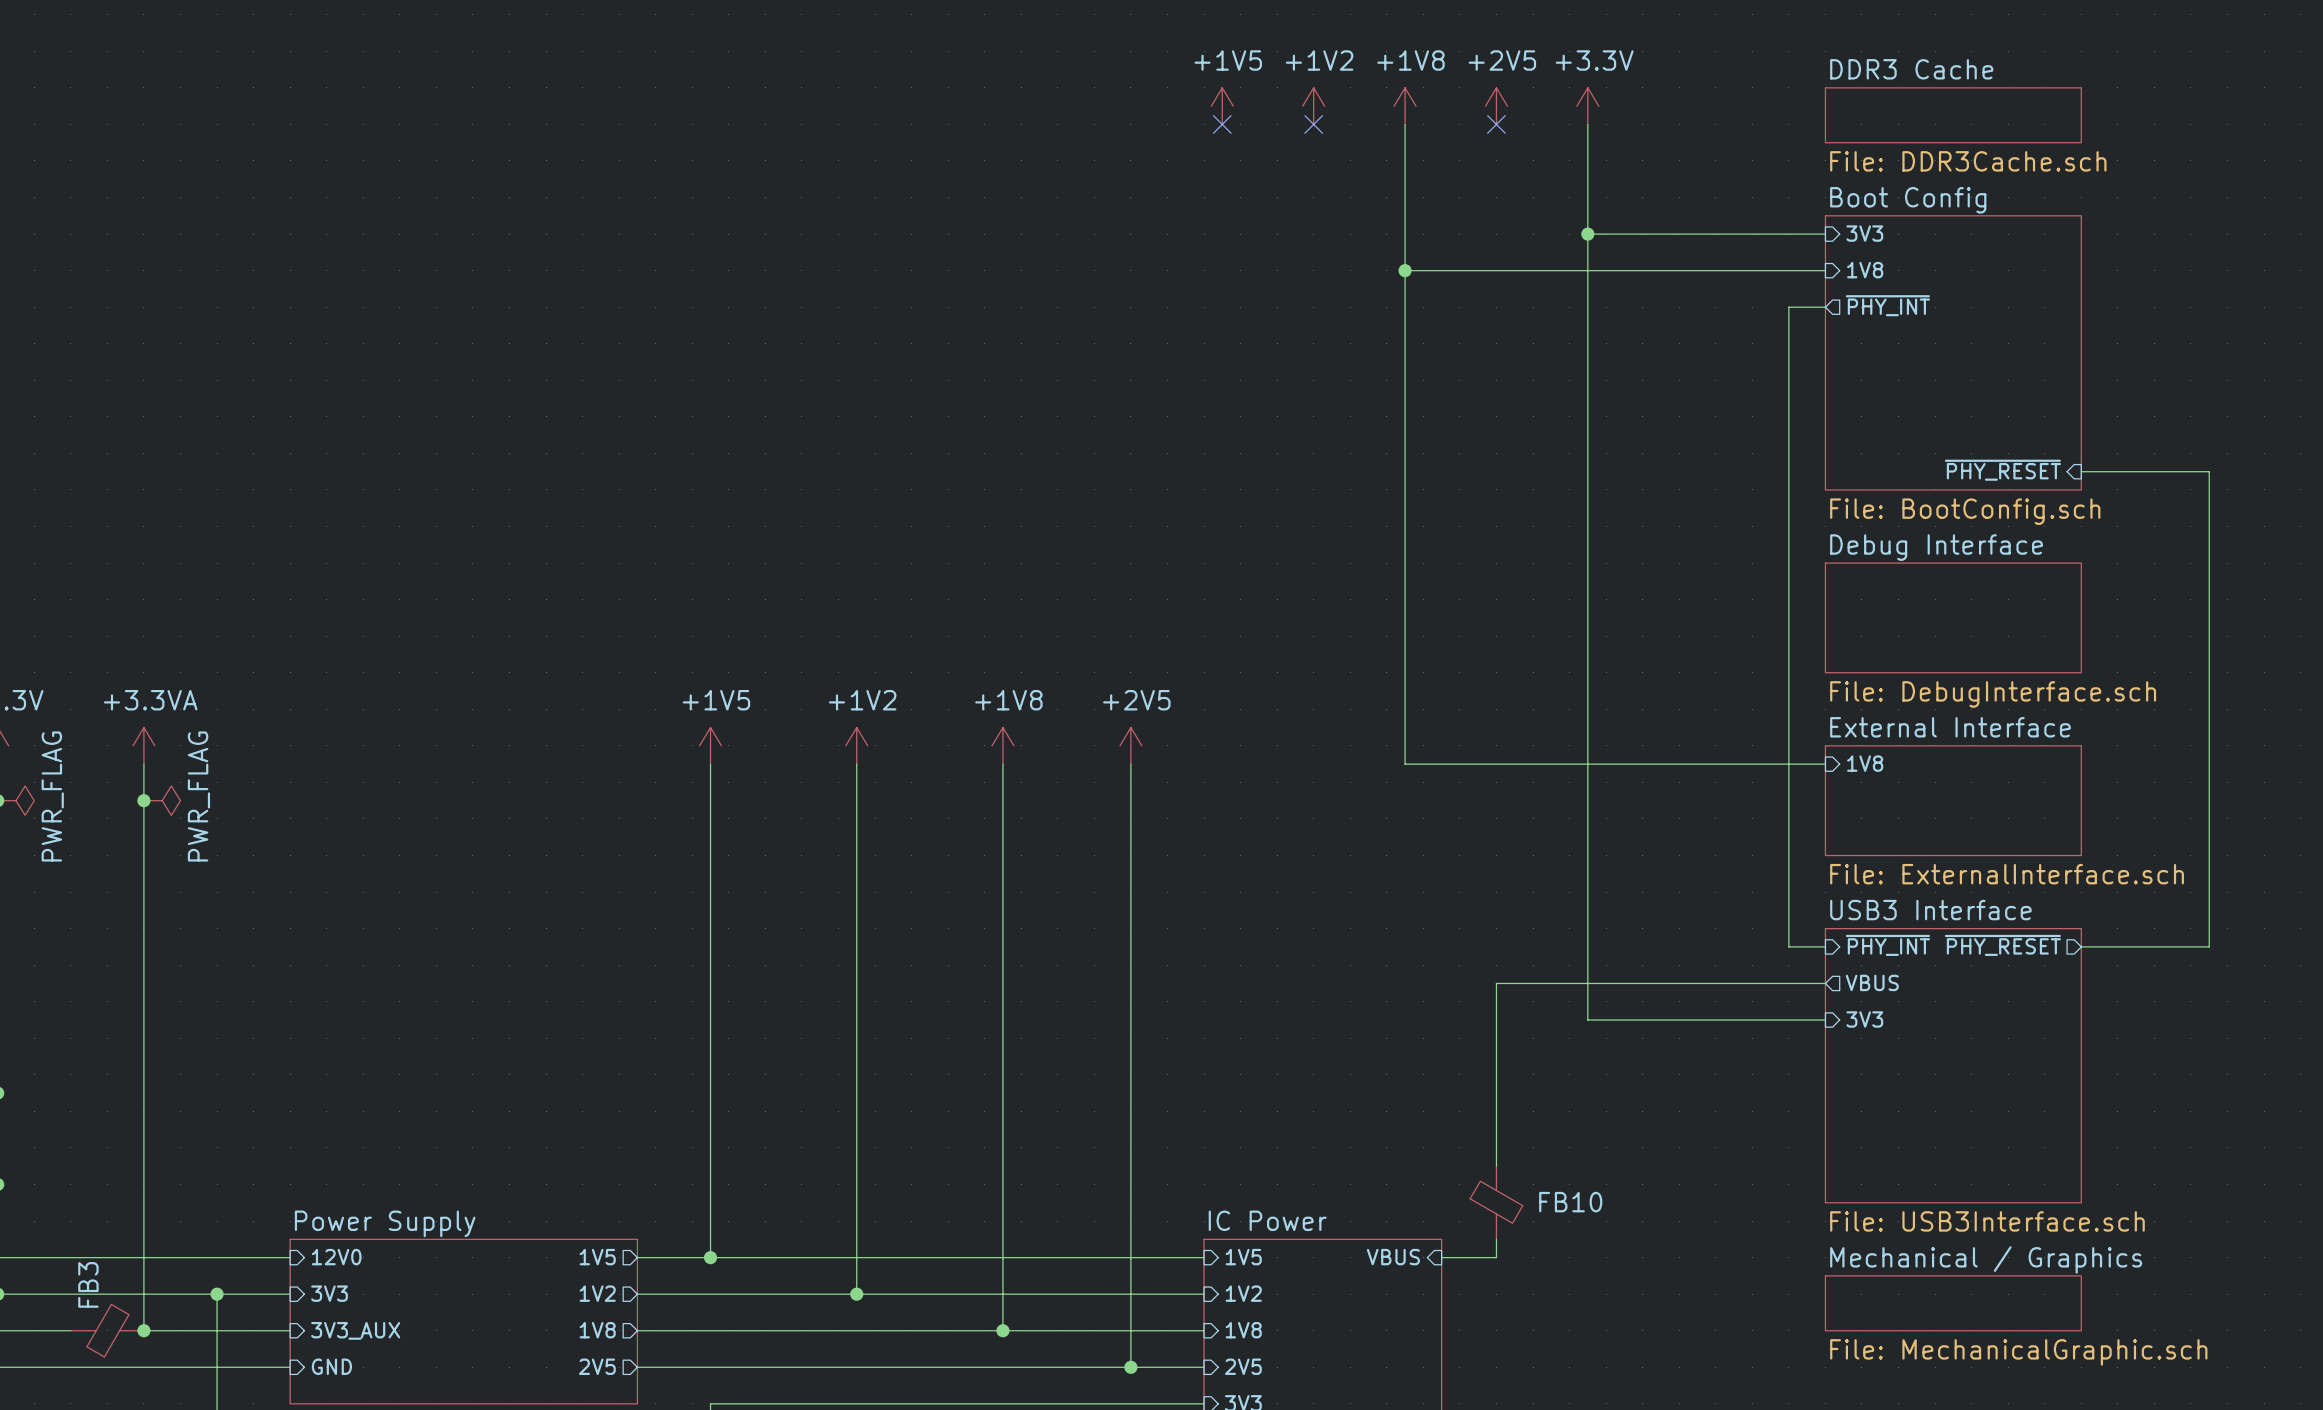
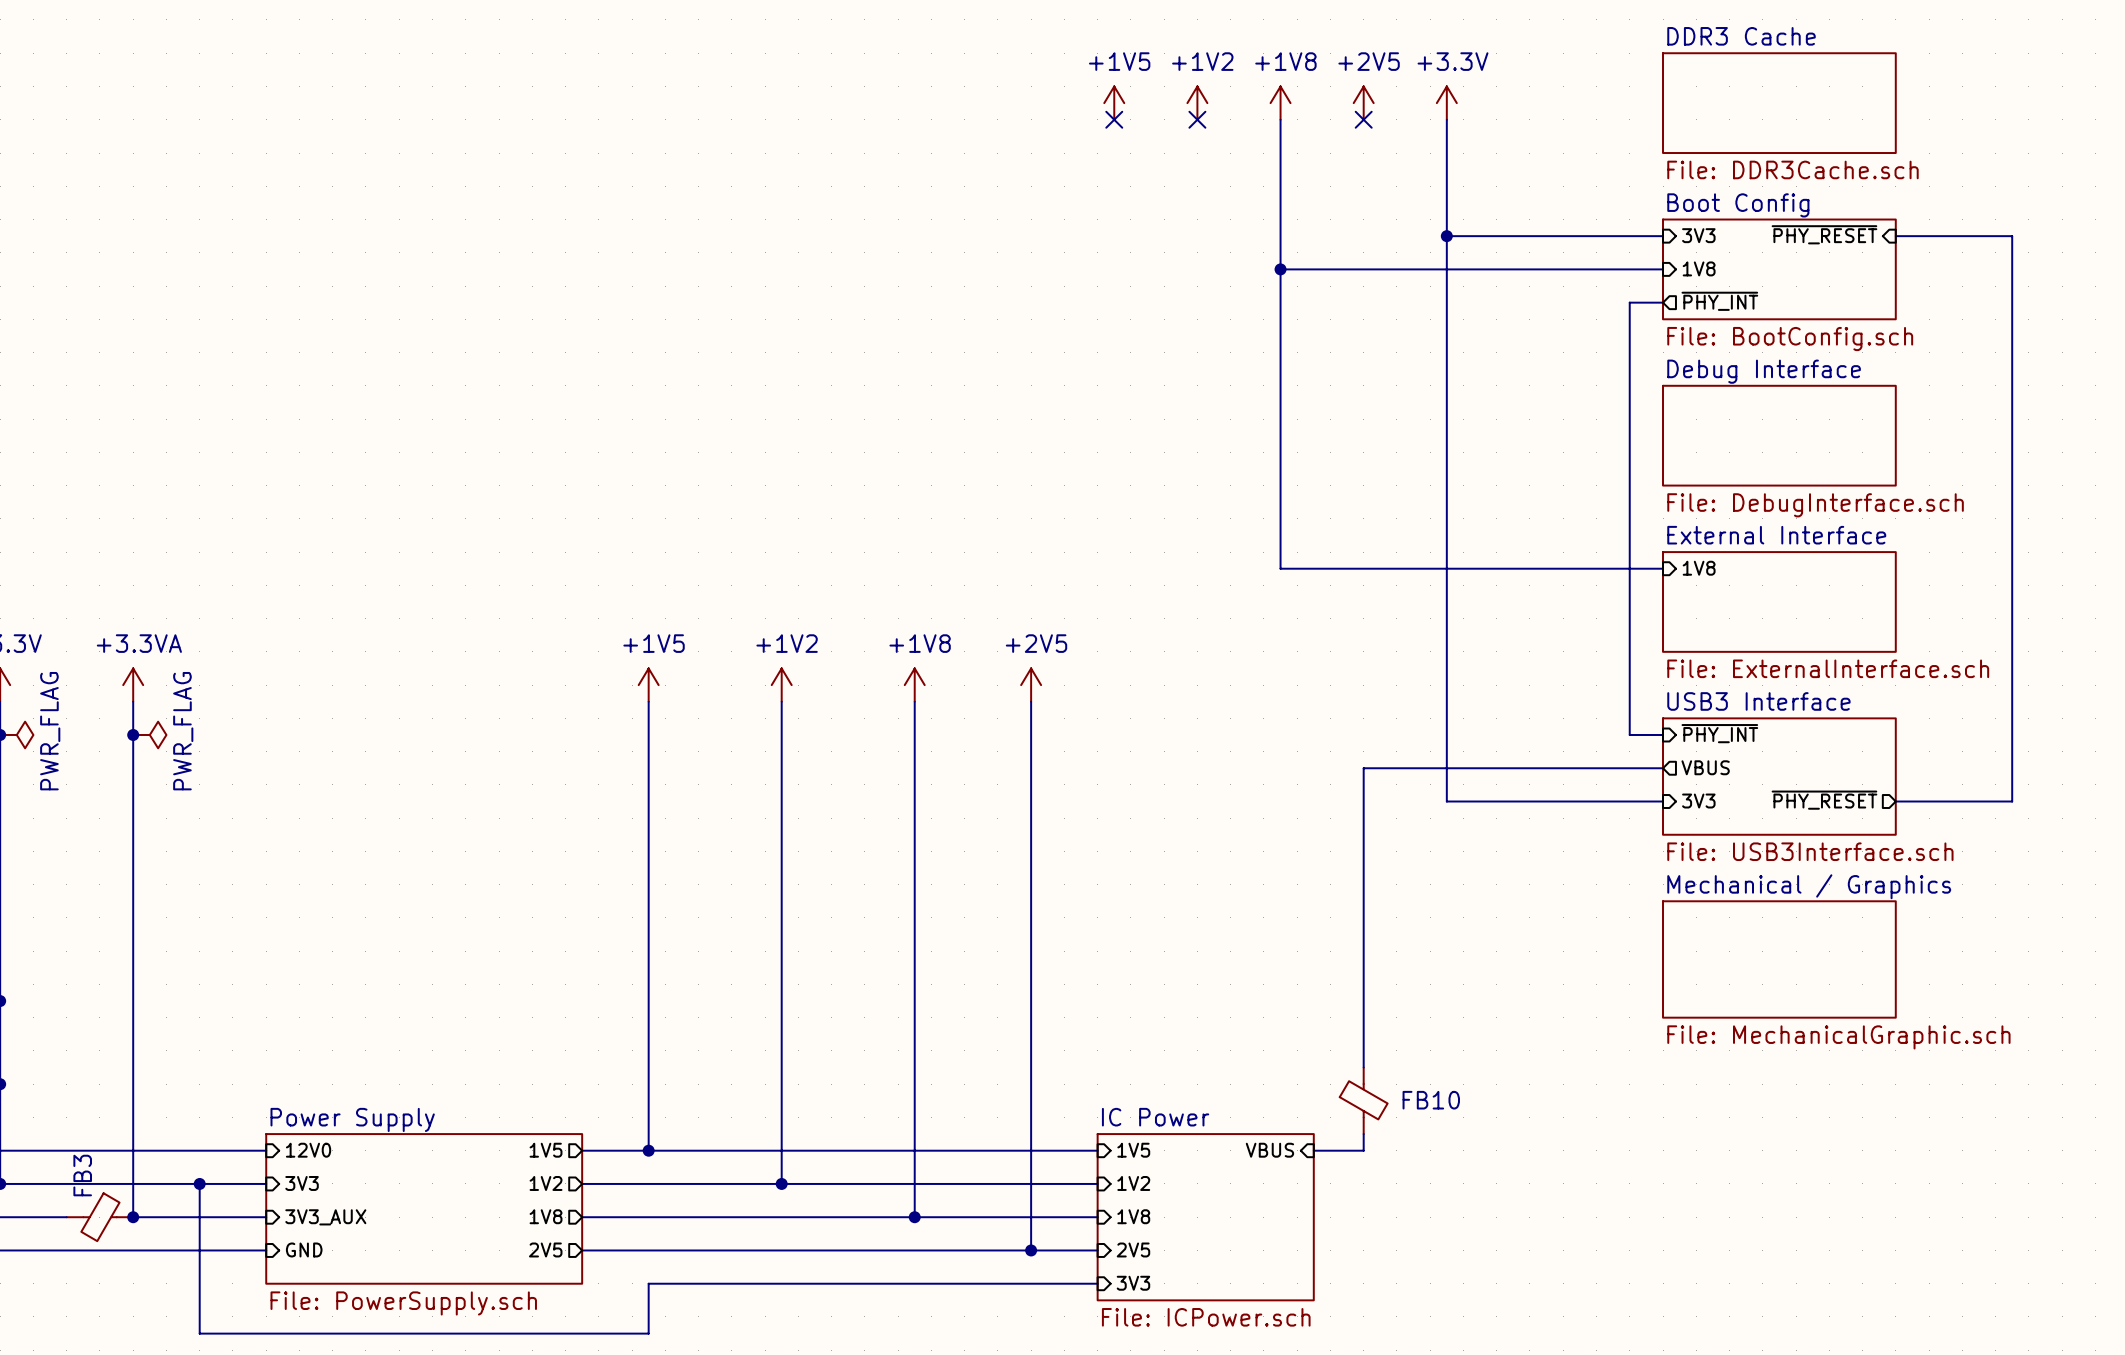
sheet DDR3 Cache shape: [1825, 87, 2082, 143] -> [1663, 53, 1896, 154]
sheet pin position: 3V3 (1864, 233) -> 3V3 (1698, 235)
wire: (1587, 234) (1825, 234) -> (1446, 236) (1663, 236)
junction position: (1587, 234) -> (1446, 236)
sheet pin: none -> ~{PHY_RESET} (1824, 234)
wire: (1405, 270) (1825, 270) -> (1280, 269) (1663, 269)
junction position: (1405, 270) -> (1280, 269)
sheet pin position: 1V8 (1865, 270) -> 1V8 (1699, 268)
sheet Boot Config: none -> File: BootConfig.sch (1779, 269)
sheet pin position: ~{PHY_INT} (1887, 305) -> ~{PHY_INT} (1719, 301)
wire: (1825, 307) (1788, 307) (1788, 325) -> (1663, 302) (1629, 302)
sheet Boot Config: File: BootConfig.sch (1953, 352) -> none
sheet pin: ~{PHY_RESET} (2002, 470) -> none
wire: (2081, 471) (2209, 471) -> (1895, 236) (2012, 236) (2012, 435)
wire: (1405, 617) (1405, 764) (1825, 764) -> (1280, 568) (1663, 568)
sheet Debug Interface position: (1953, 617) -> (1779, 435)
sheet pin position: 1V8 (1865, 763) -> 1V8 (1699, 568)
wire: (1788, 800) (1788, 946) (1825, 946) -> (1629, 734) (1663, 734)
sheet External Interface position: (1953, 800) -> (1779, 601)
wire: (1587, 873) (1587, 1020) (1825, 1020) -> (1446, 801) (1663, 801)
wire: (2209, 873) (2209, 946) (2081, 946) -> (2012, 801) (1895, 801)
sheet USB3 Interface name position: USB3 Interface (1930, 910) -> USB3 Interface (1758, 701)
sheet USB3 Interface shape: [1825, 928, 2082, 1203] -> [1663, 718, 1896, 835]
sheet pin position: ~{PHY_INT} (1887, 945) -> ~{PHY_INT} (1719, 733)
sheet pin position: ~{PHY_RESET} (2002, 945) -> ~{PHY_RESET} (1824, 800)
sheet pin position: VBUS (1872, 982) -> VBUS (1705, 767)
wire: (1496, 983) (1825, 983) -> (1363, 901) (1363, 768) (1663, 768)
sheet pin position: 3V3 (1864, 1019) -> 3V3 (1698, 801)
sheet Mechanical / Graphics: none -> File: MechanicalGraphic.sch (1779, 959)
sheet USB3 Interface value position: File: USB3Interface.sch (1987, 1221) -> File: USB3Interface.sch (1810, 851)
sheet Mechanical / Graphics: File: MechanicalGraphic.sch (1953, 1303) -> none

